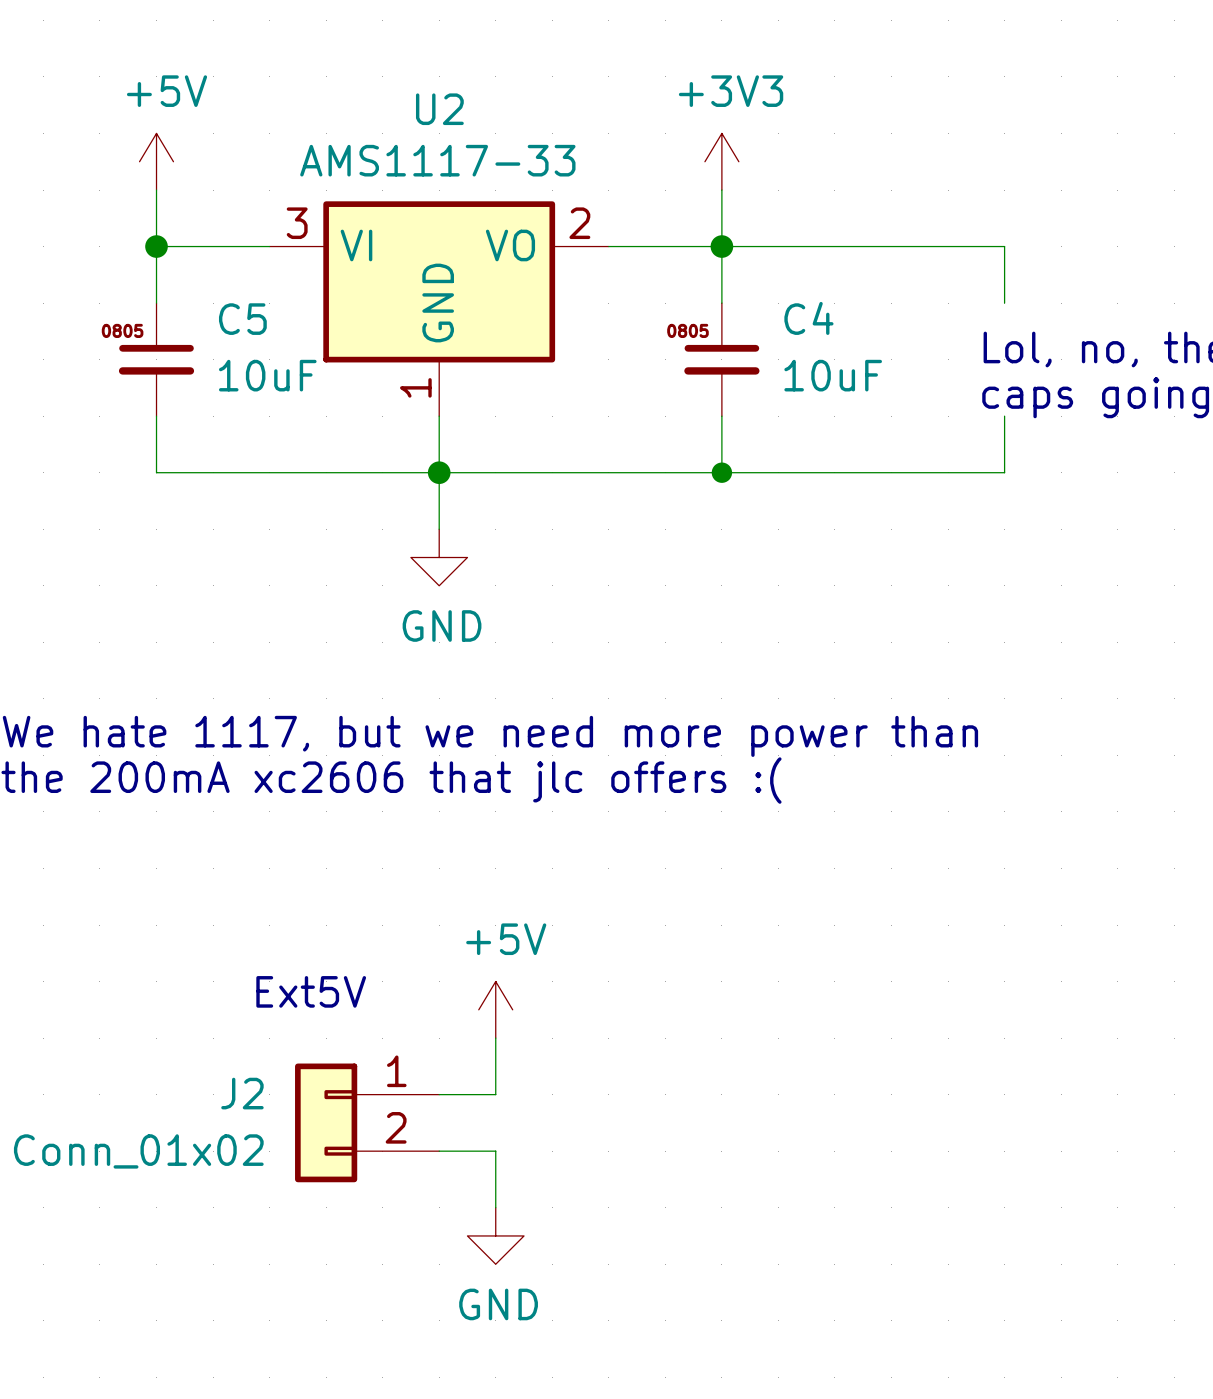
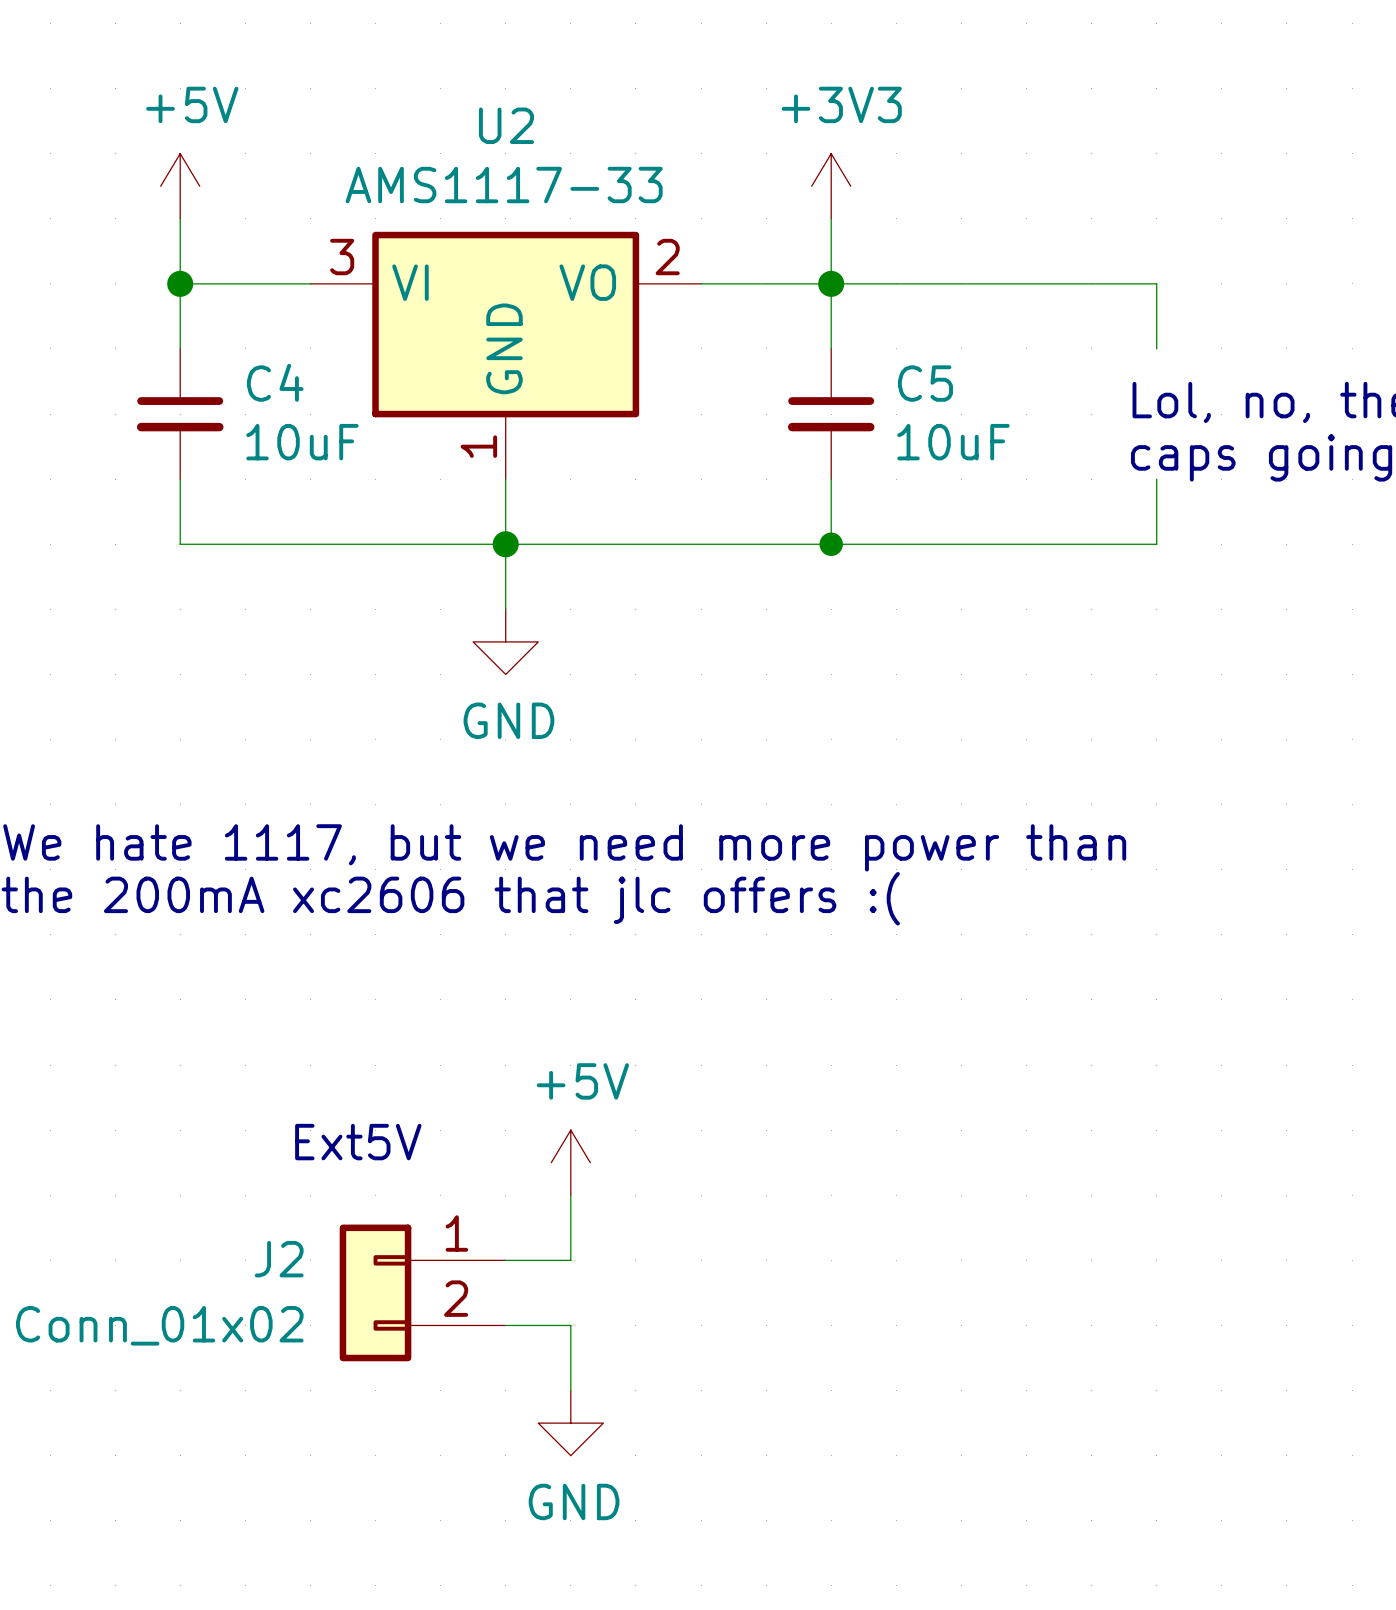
C4 name position: C4 (808, 318) -> C4 (275, 382)
C5 name position: C5 (242, 319) -> C5 (925, 383)
C5 text: 0805 (122, 330) -> none
C4 text: 0805 (687, 330) -> none
C5 position: (156, 359) -> (831, 414)
C4 position: (721, 359) -> (180, 414)
C5 value position: 10uF (267, 375) -> 10uF (953, 442)
C4 value position: 10uF (833, 375) -> 10uF (302, 442)

